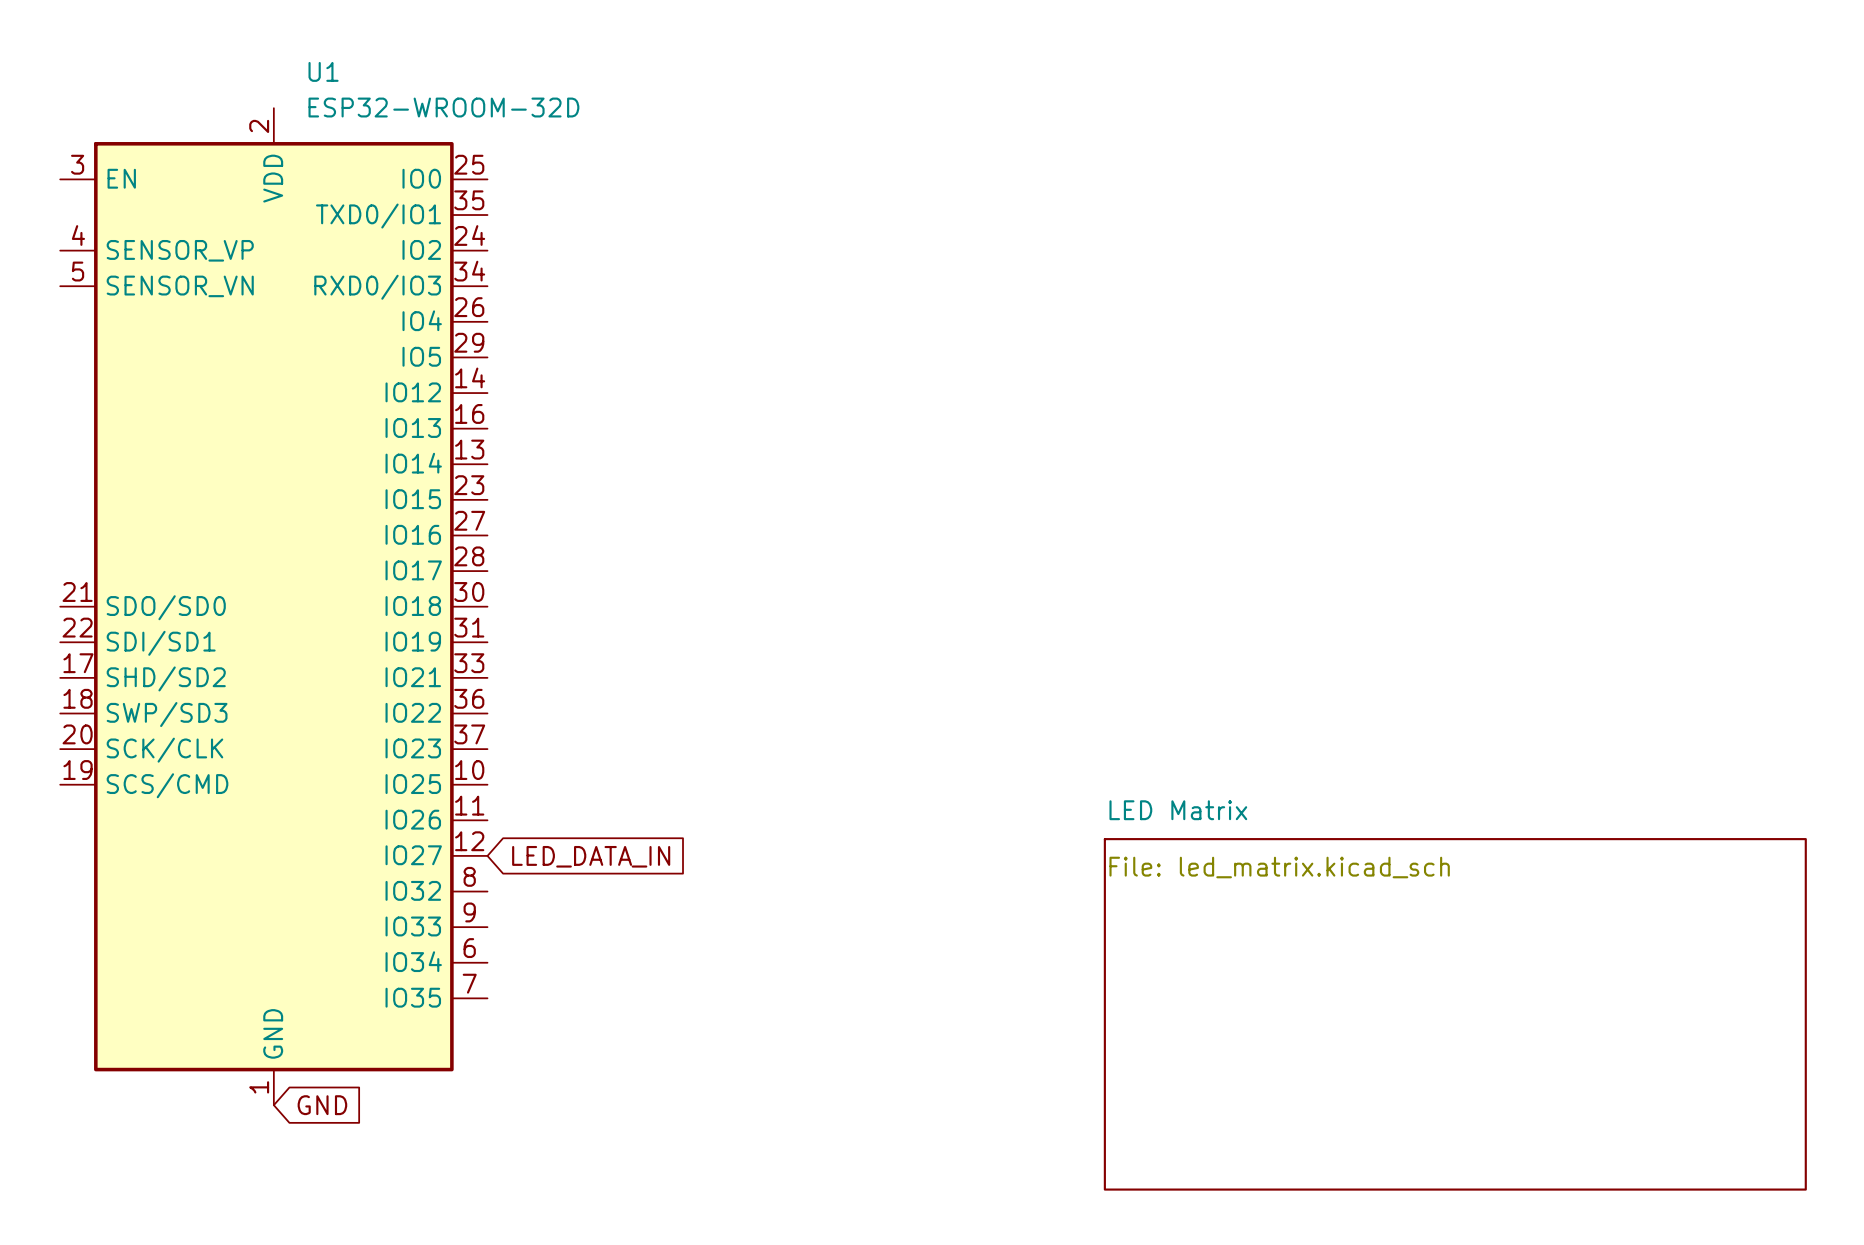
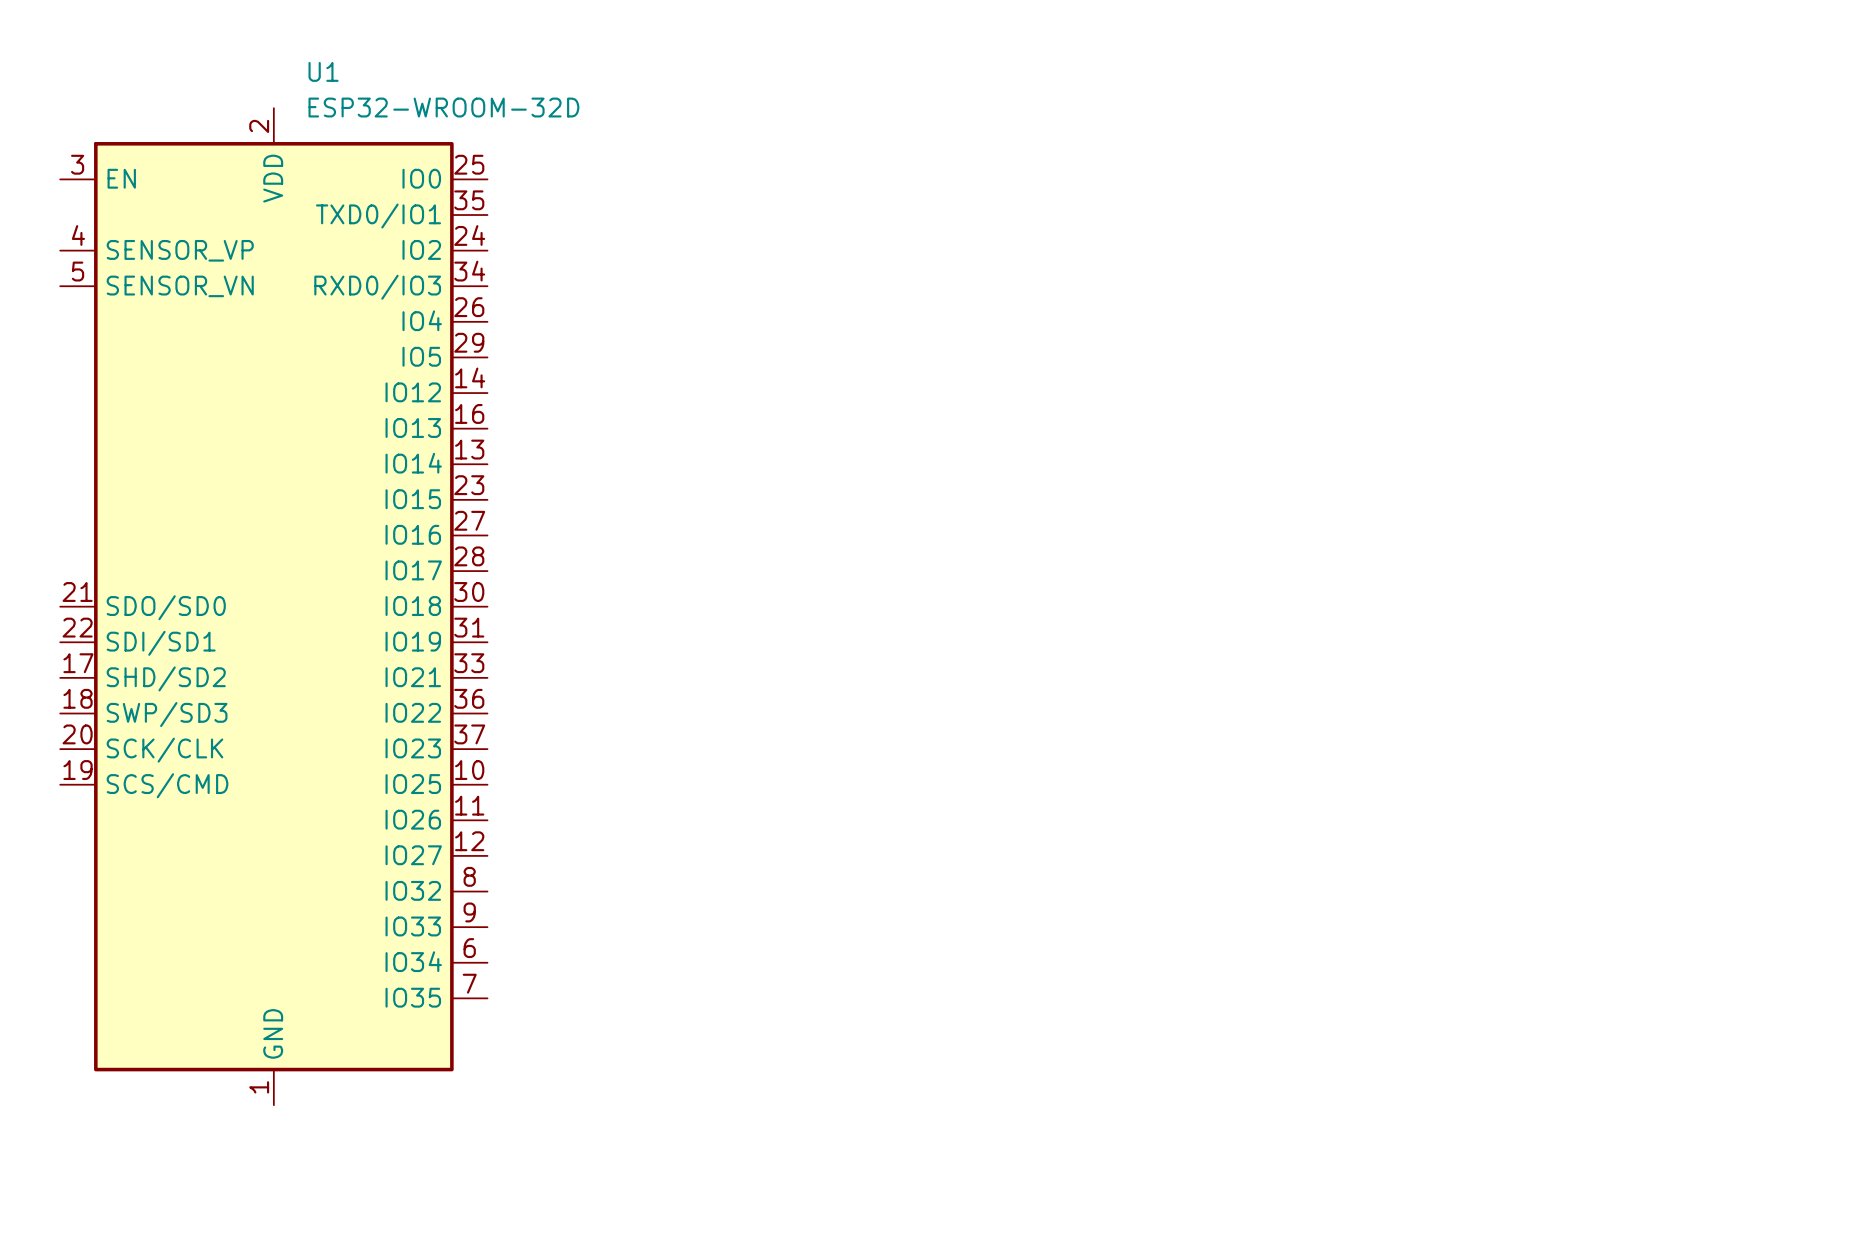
global label: LED_DATA_IN (591, 856) -> none
sheet LED Matrix: File: led_matrix.kicad_sch (1455, 1014) -> none
global label: GND (322, 1105) -> none

